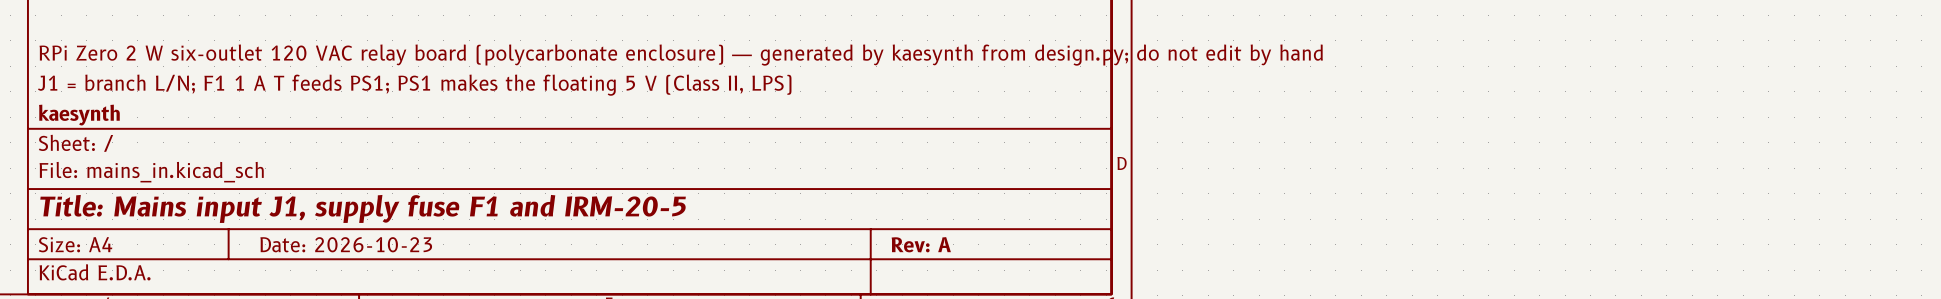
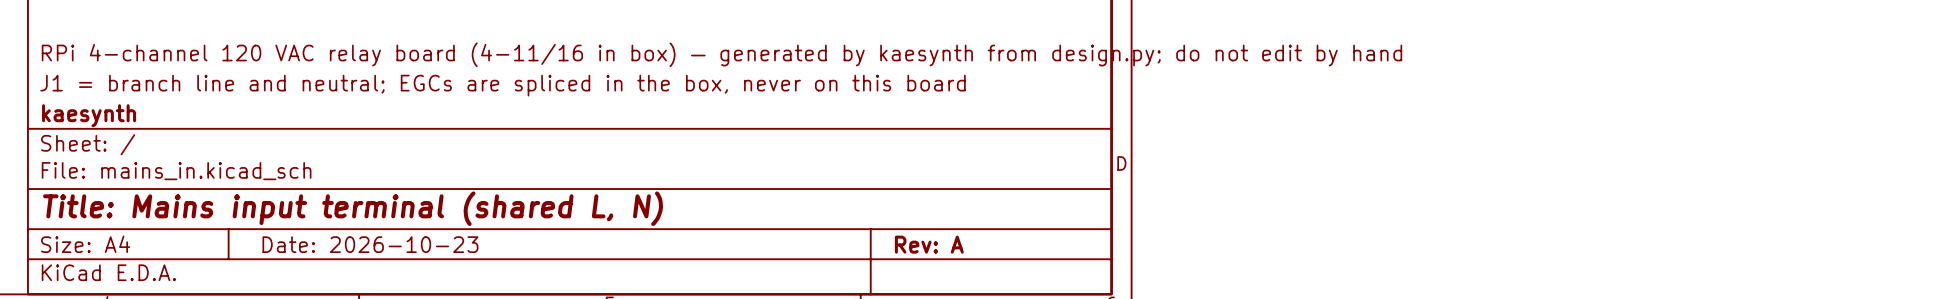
title block: RPi Zero 2 W six-outlet 120 VAC relay board (polycarbonate enclosure) — generated by kaesynth from design.py; do not edit by hand (681, 55) -> RPi 4-channel 120 VAC relay board (4-11/16 in box) — generated by kaesynth from design.py; do not edit by hand (721, 54)
title block: J1 = branch L/N; F1 1 A T feeds PS1; PS1 makes the floating 5 V (Class II, LPS) (414, 85) -> J1 = branch line and neutral; EGCs are spliced in the box, never on this board (503, 85)
title block: Title: Mains input J1, supply fuse F1 and IRM-20-5 (363, 208) -> Title: Mains input terminal (shared L, N) (353, 208)

